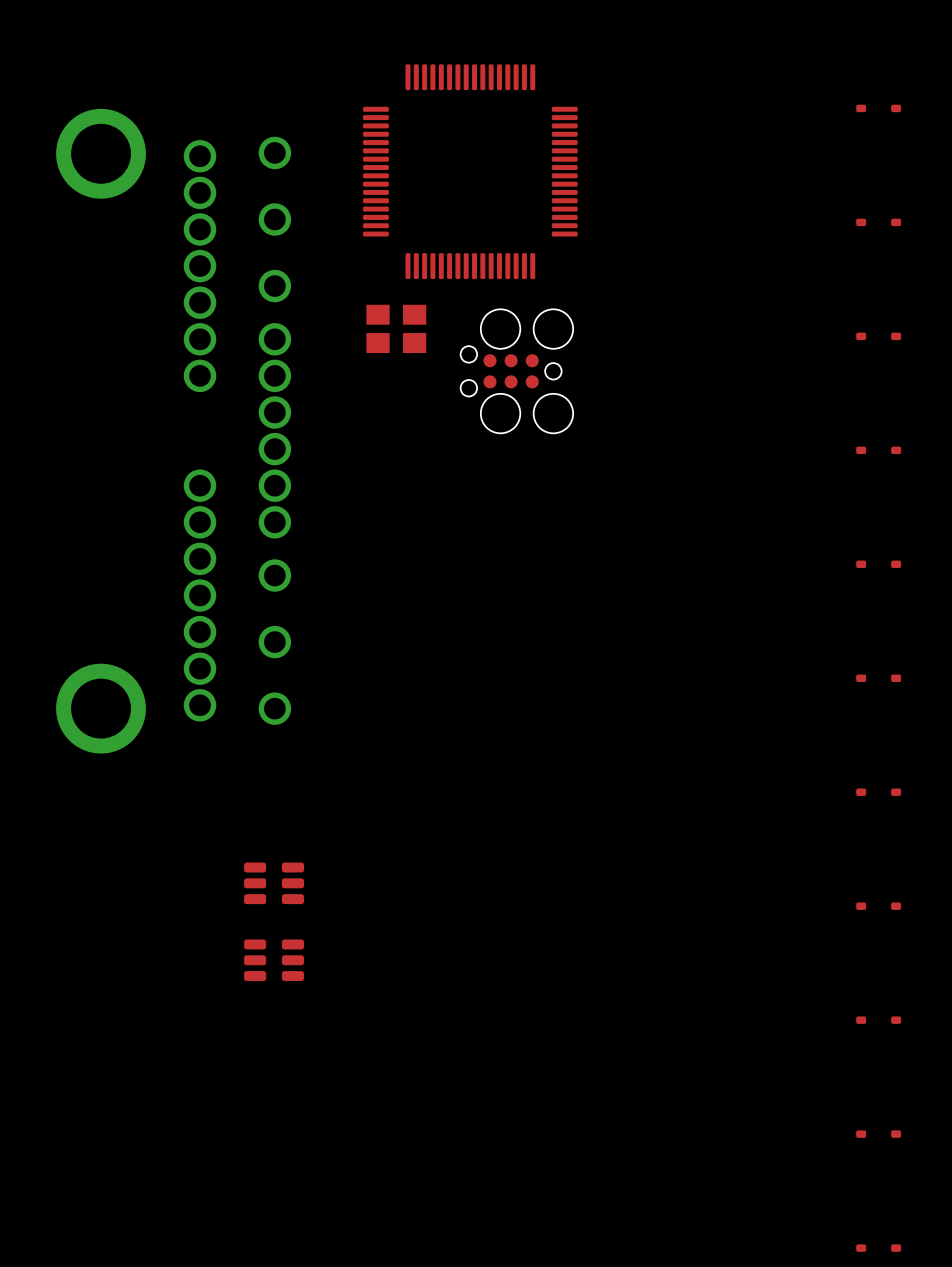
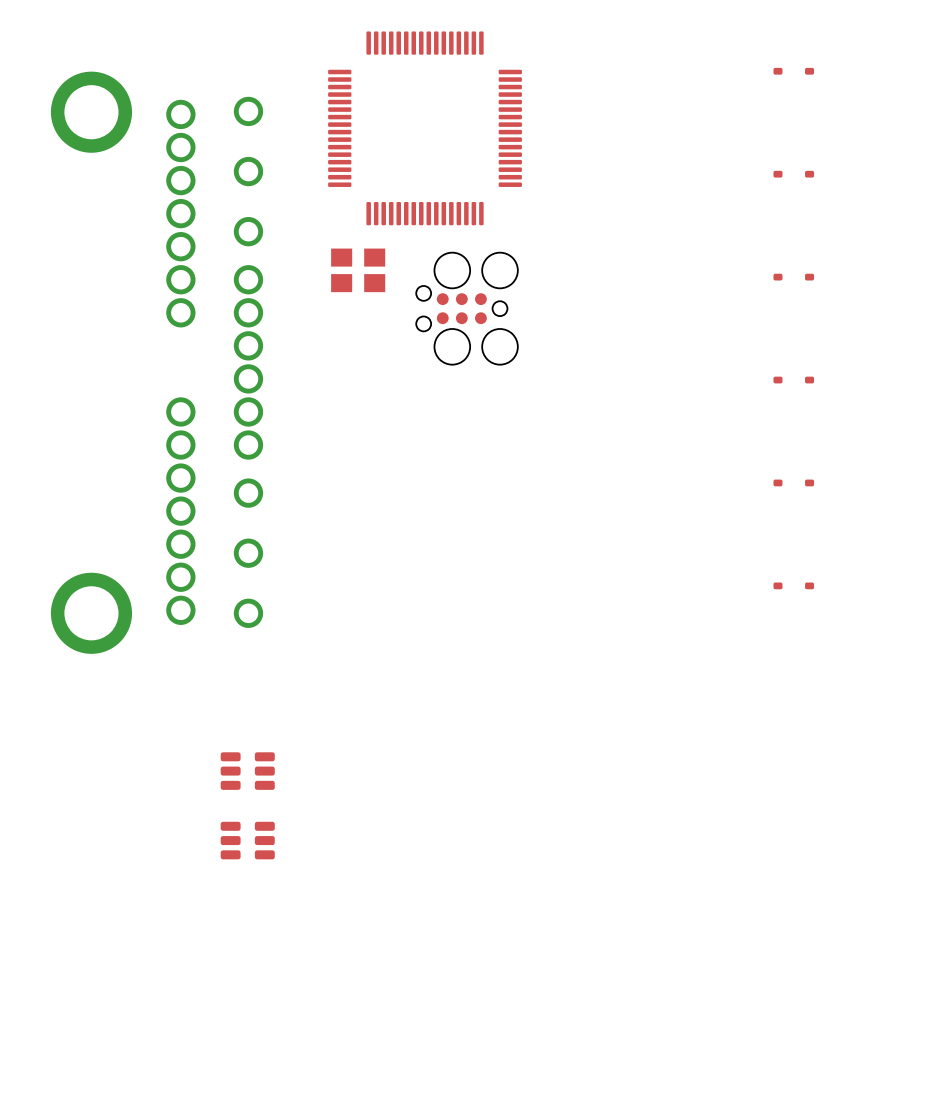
part: (878, 792) -> none
part: (878, 906) -> none
part: (878, 1020) -> none
part: (878, 1134) -> none
part: (878, 1248) -> none

